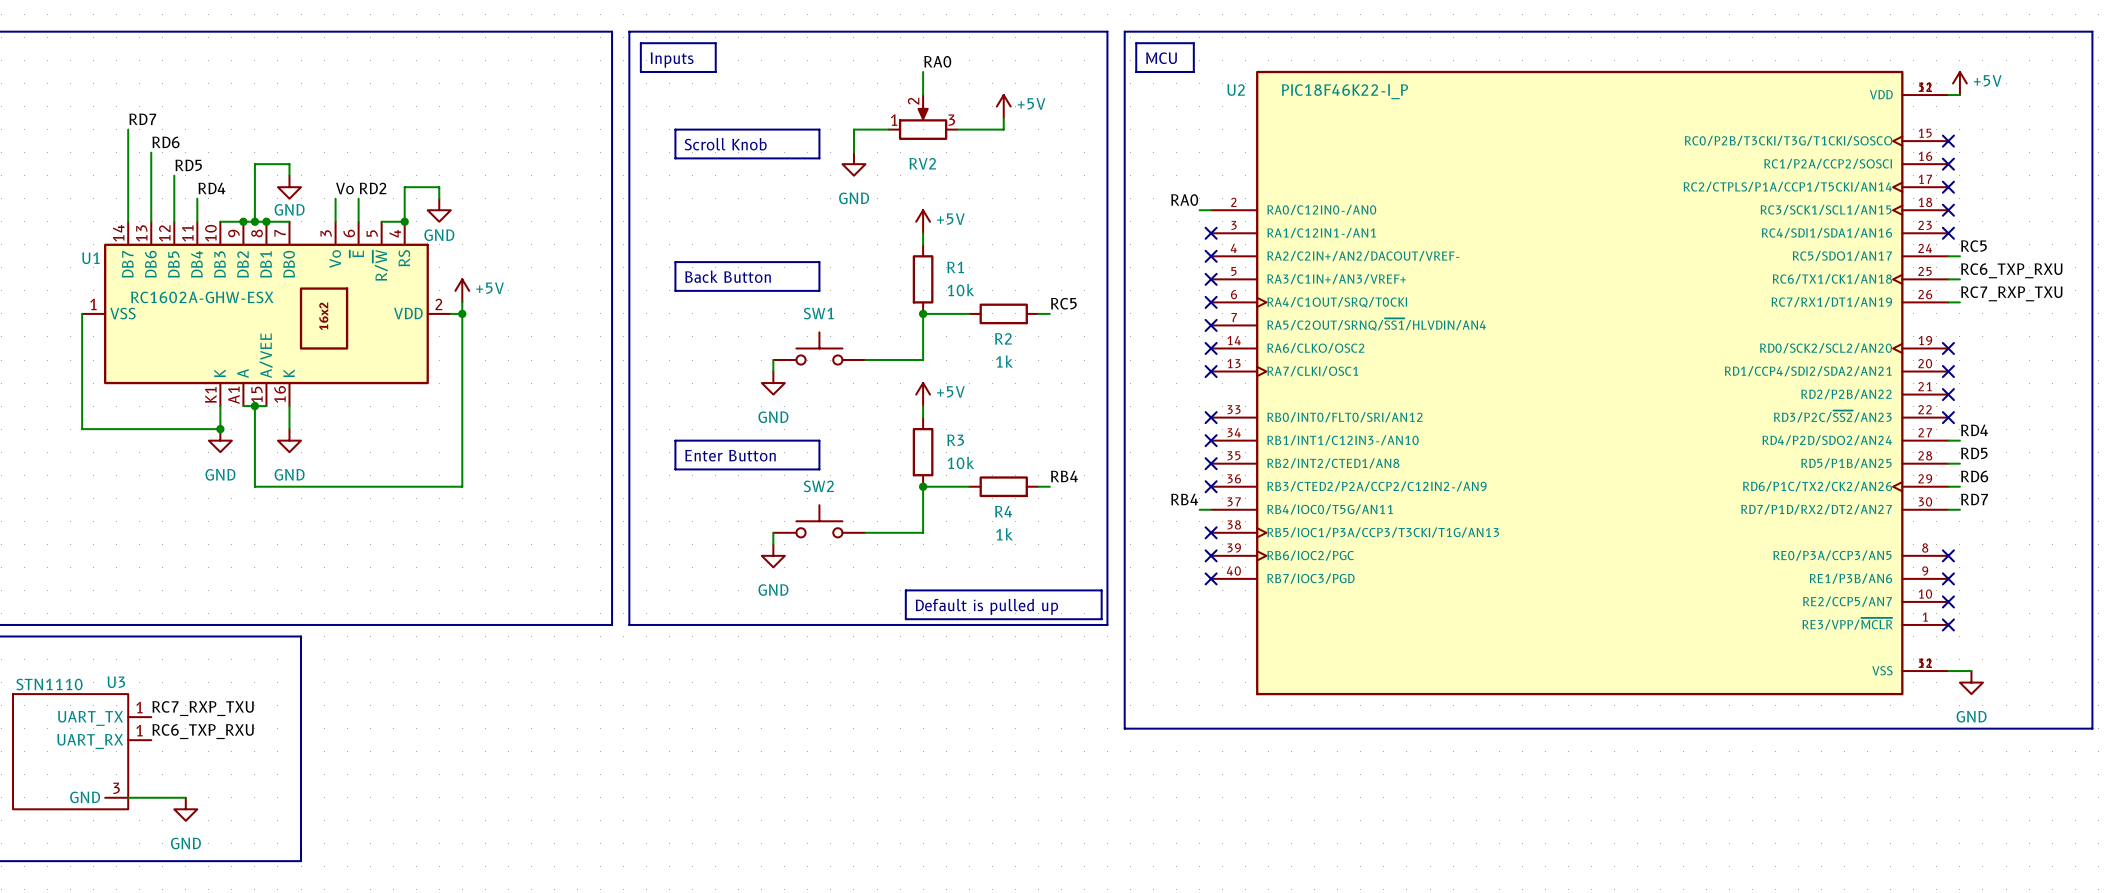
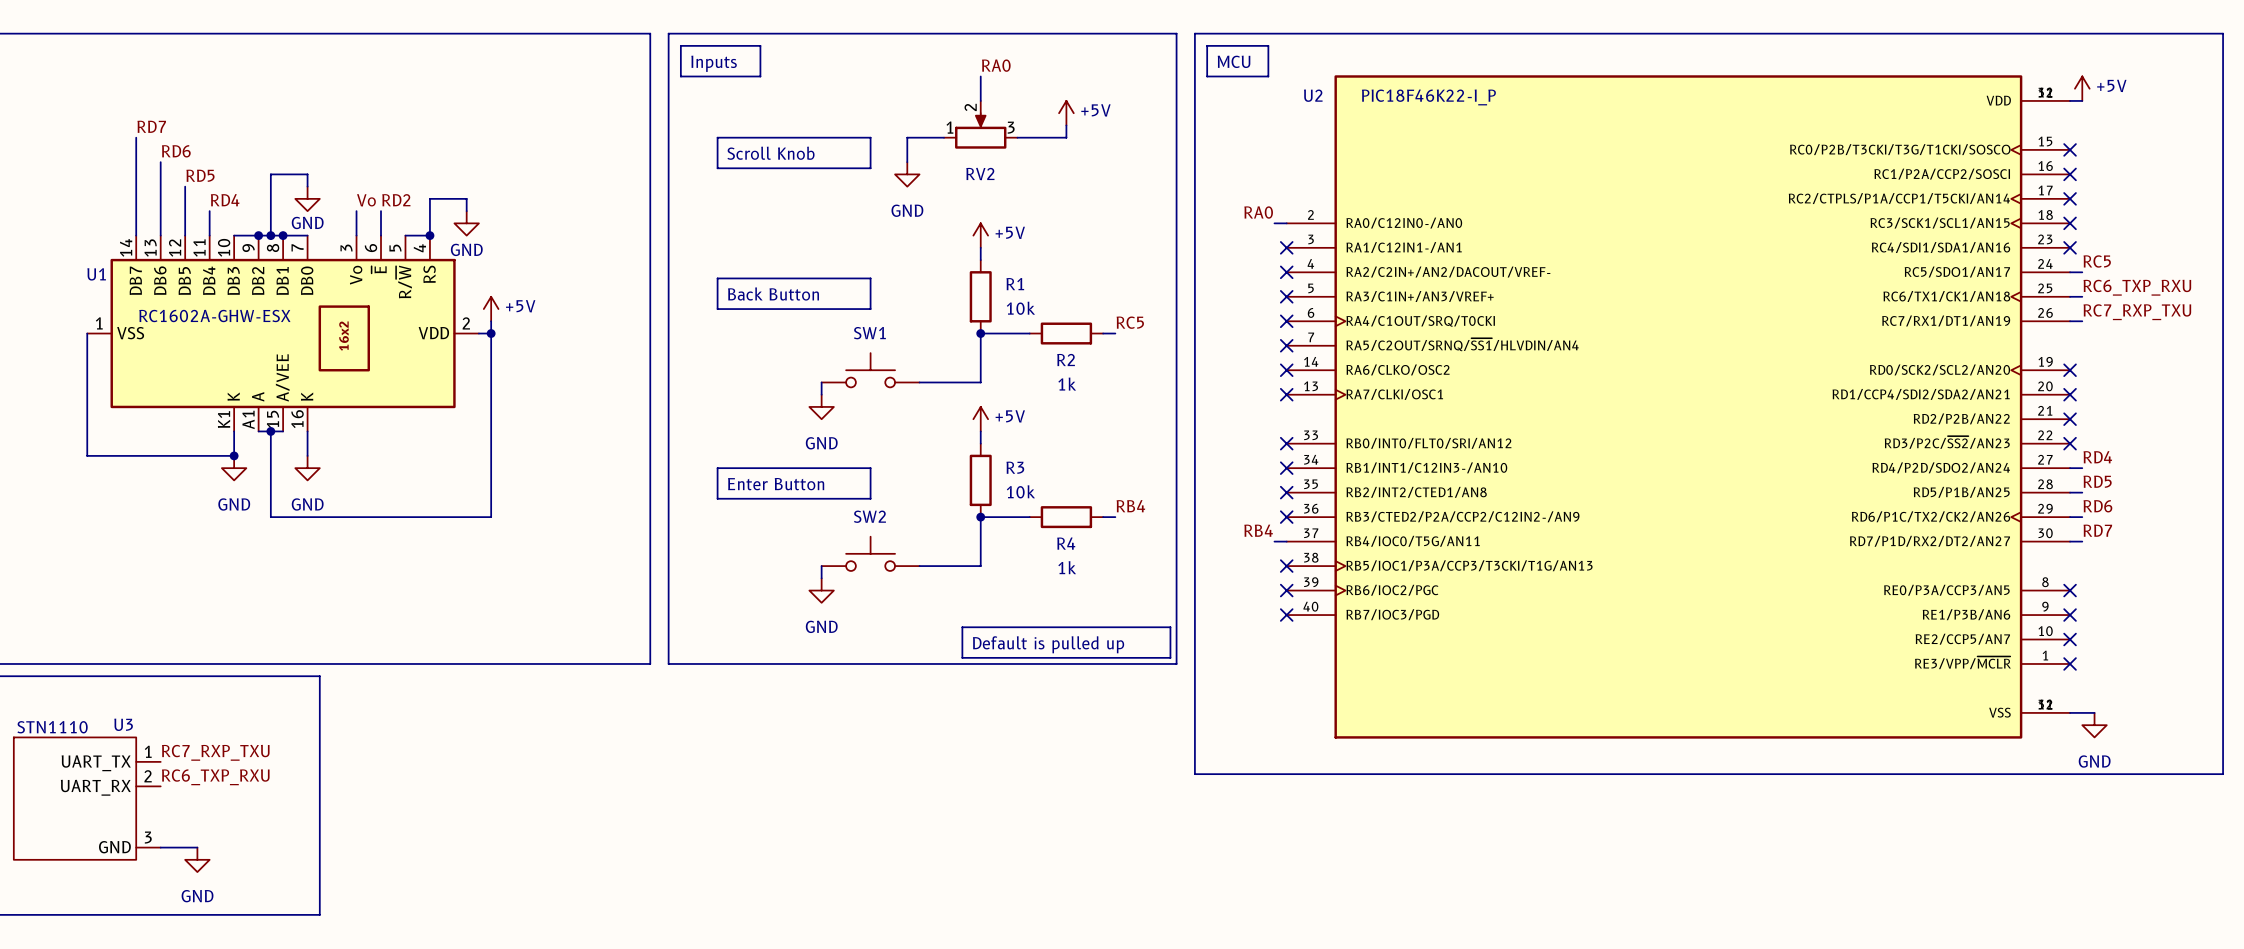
U3 symbol: [13, 694, 152, 810] -> [13, 737, 161, 860]

